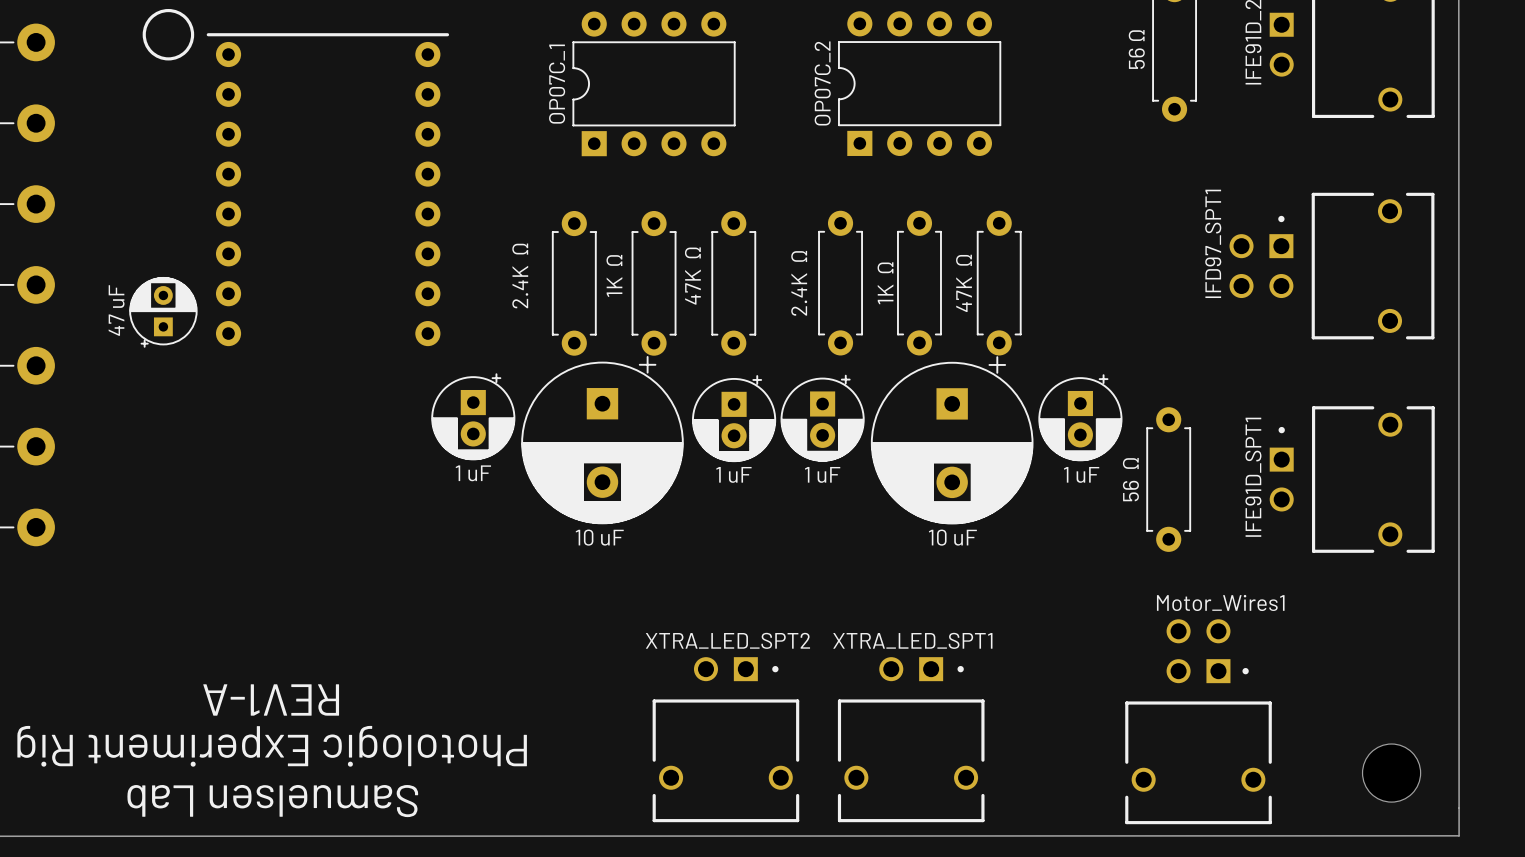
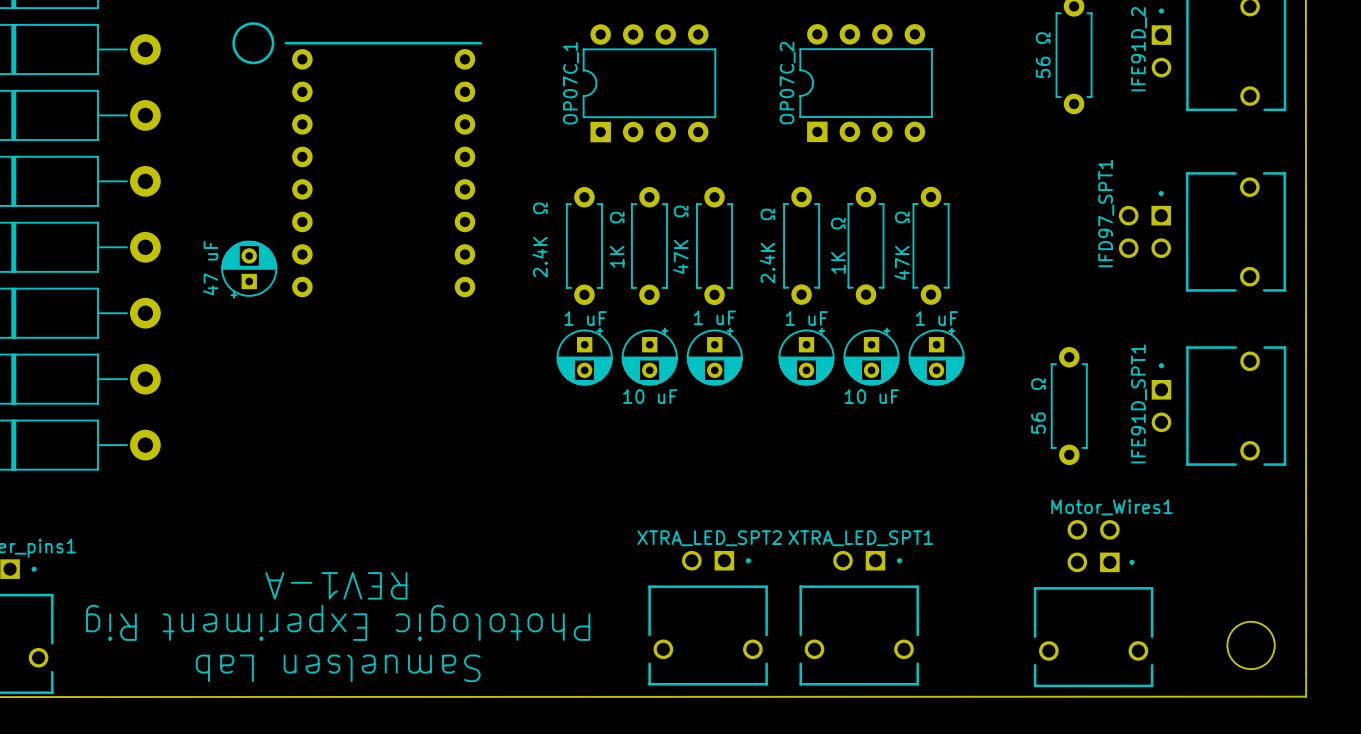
part footprint: [692, 375, 777, 463] -> [686, 327, 743, 386]
part: 1 uF (473, 416) -> none
part: 1 uF (1080, 417) -> none
part: none -> 1 uF (584, 356)
part: none -> 10 uF (649, 356)
part: 1 uF (822, 418) -> none
part: none -> 1 uF (806, 356)
part: none -> 10 uF (871, 356)
part: none -> 1 uF (936, 356)
part: 10 uF (602, 440) -> none
part: 10 uF (952, 440) -> none
part value position: 1 uF (733, 474) -> 1 uF (714, 317)

